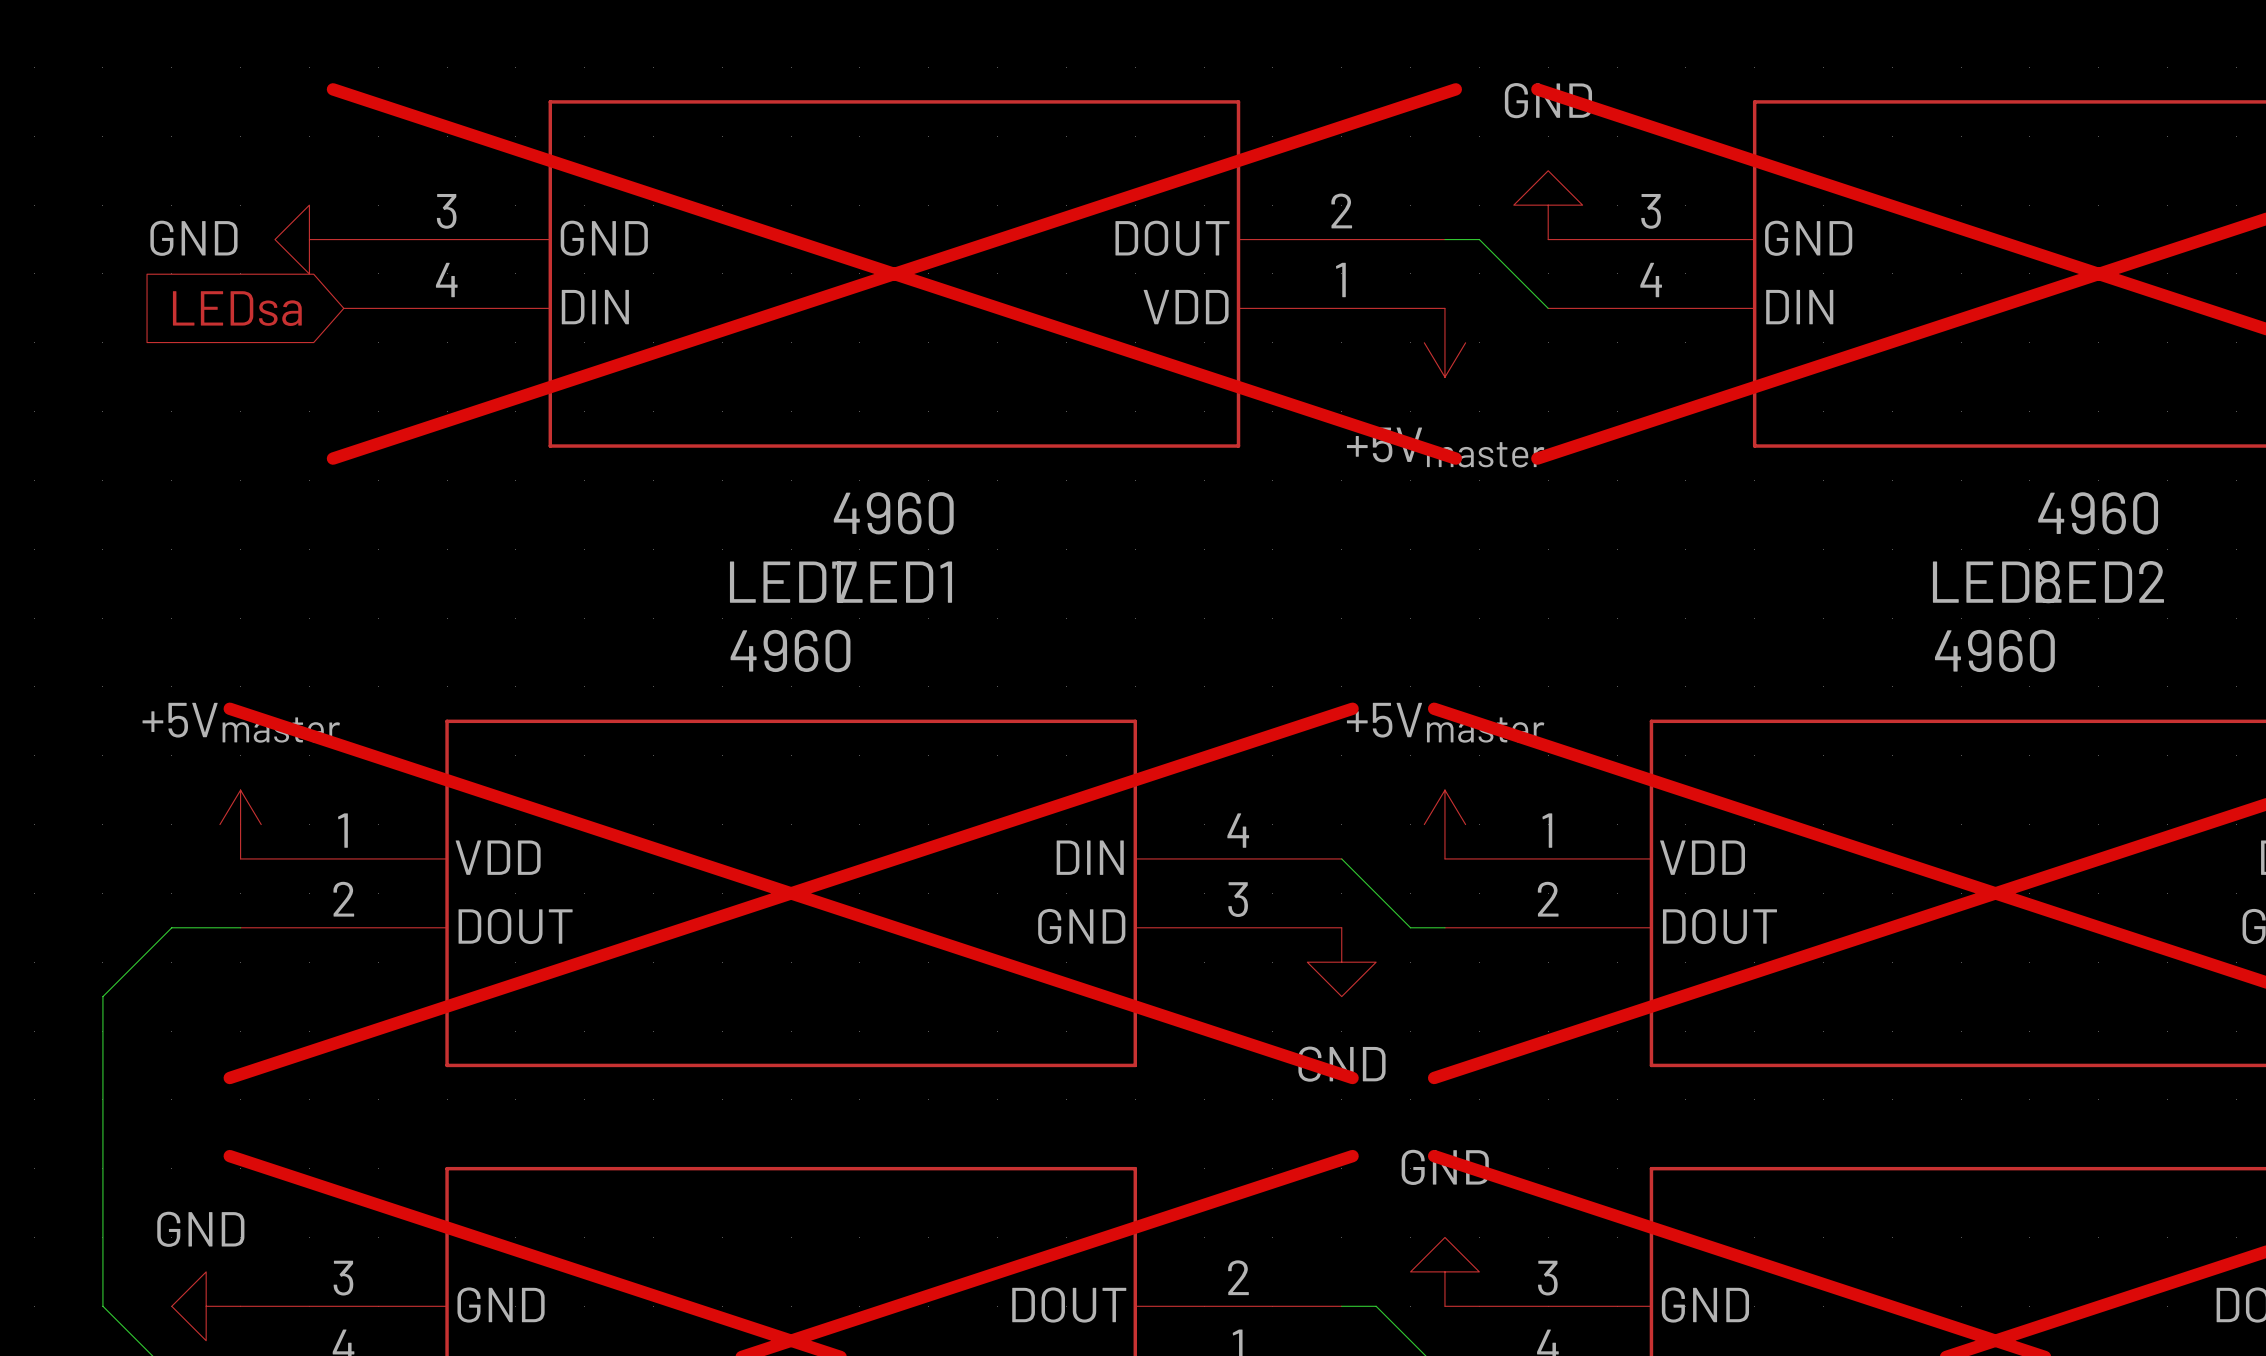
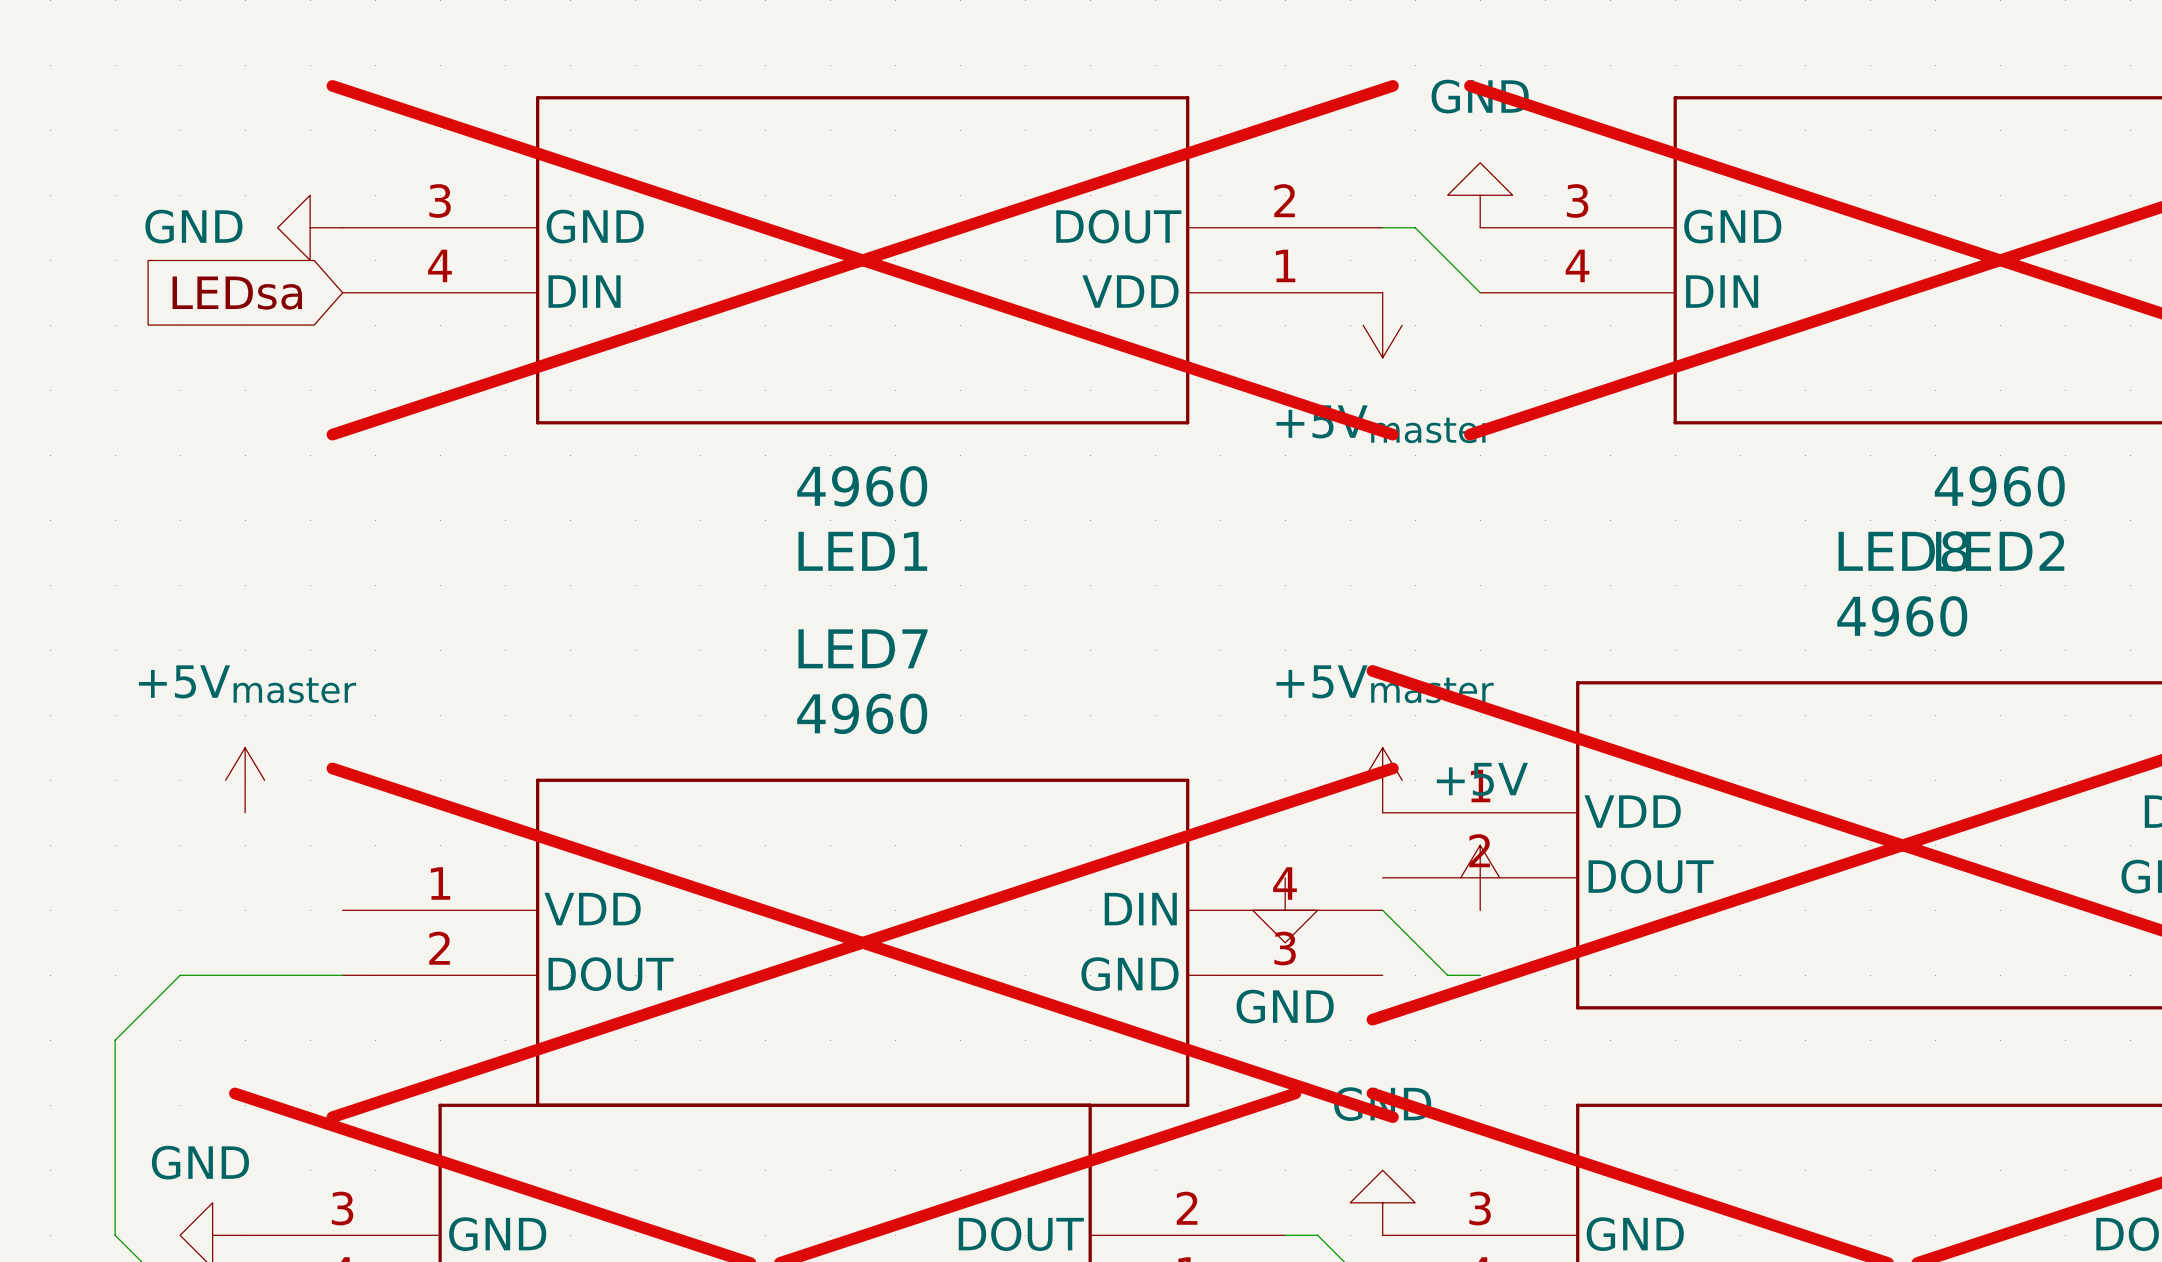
wire: (1341, 858) (1410, 927) (1444, 927) -> (1382, 910) (1447, 975) (1480, 975)
LED7 position: (791, 893) -> (862, 942)
wire: (240, 927) (171, 927) (102, 996) (102, 1099) -> (342, 975) (180, 975) (115, 1040)
power symbol: none -> +5V (1480, 877)

